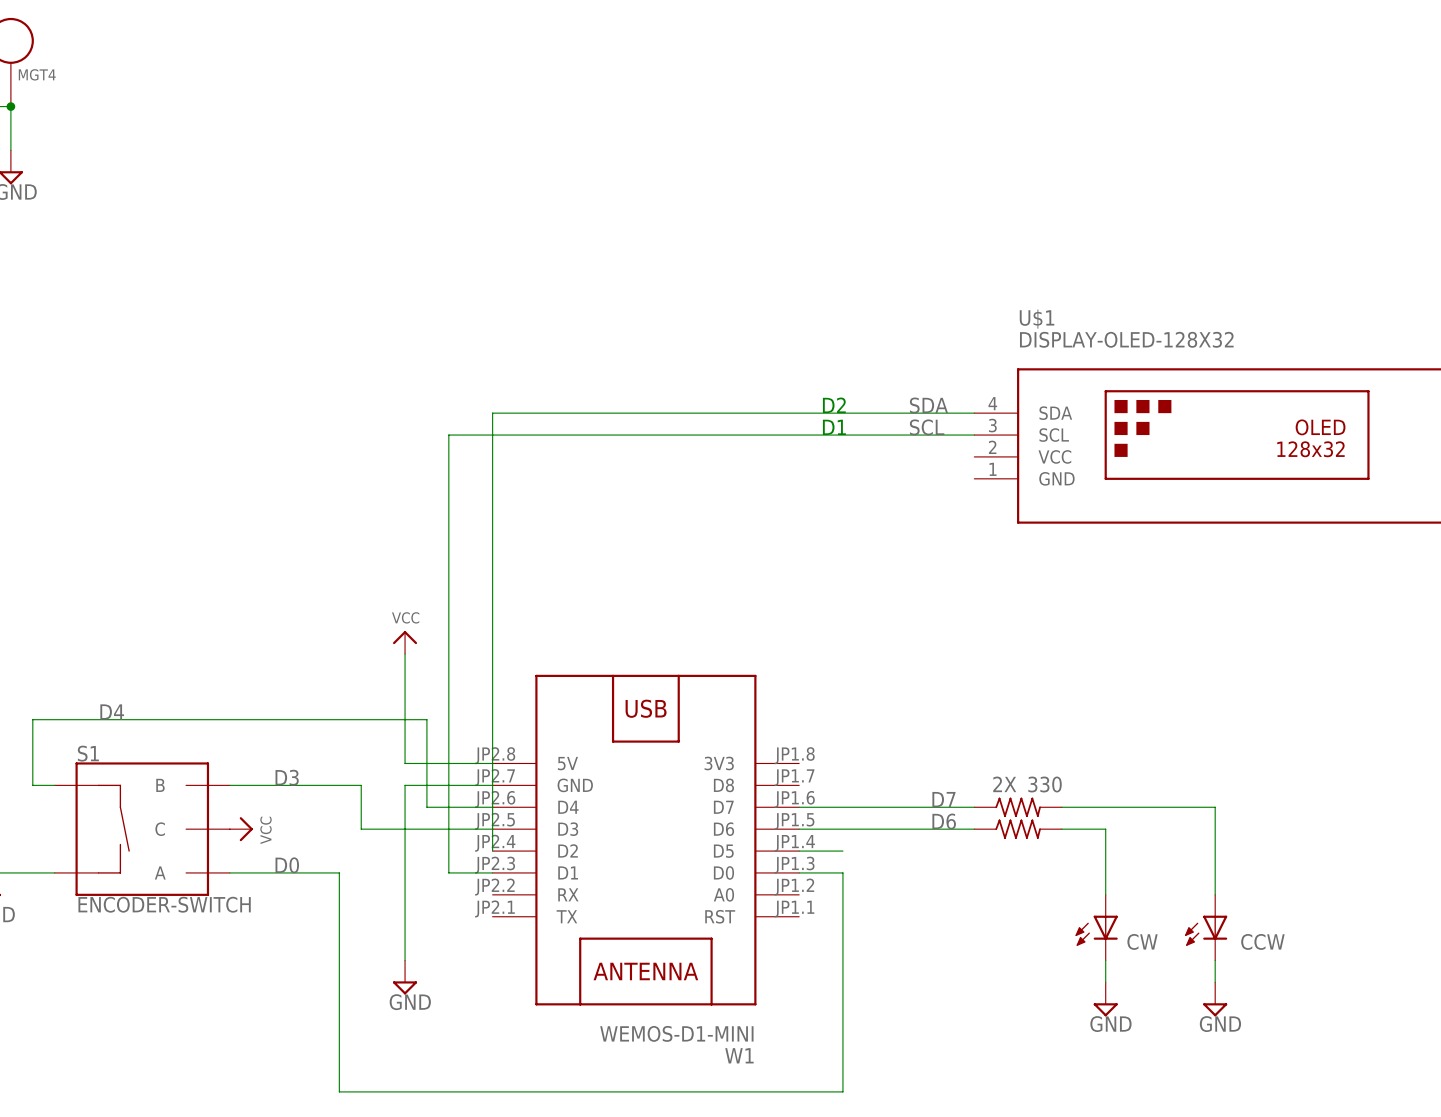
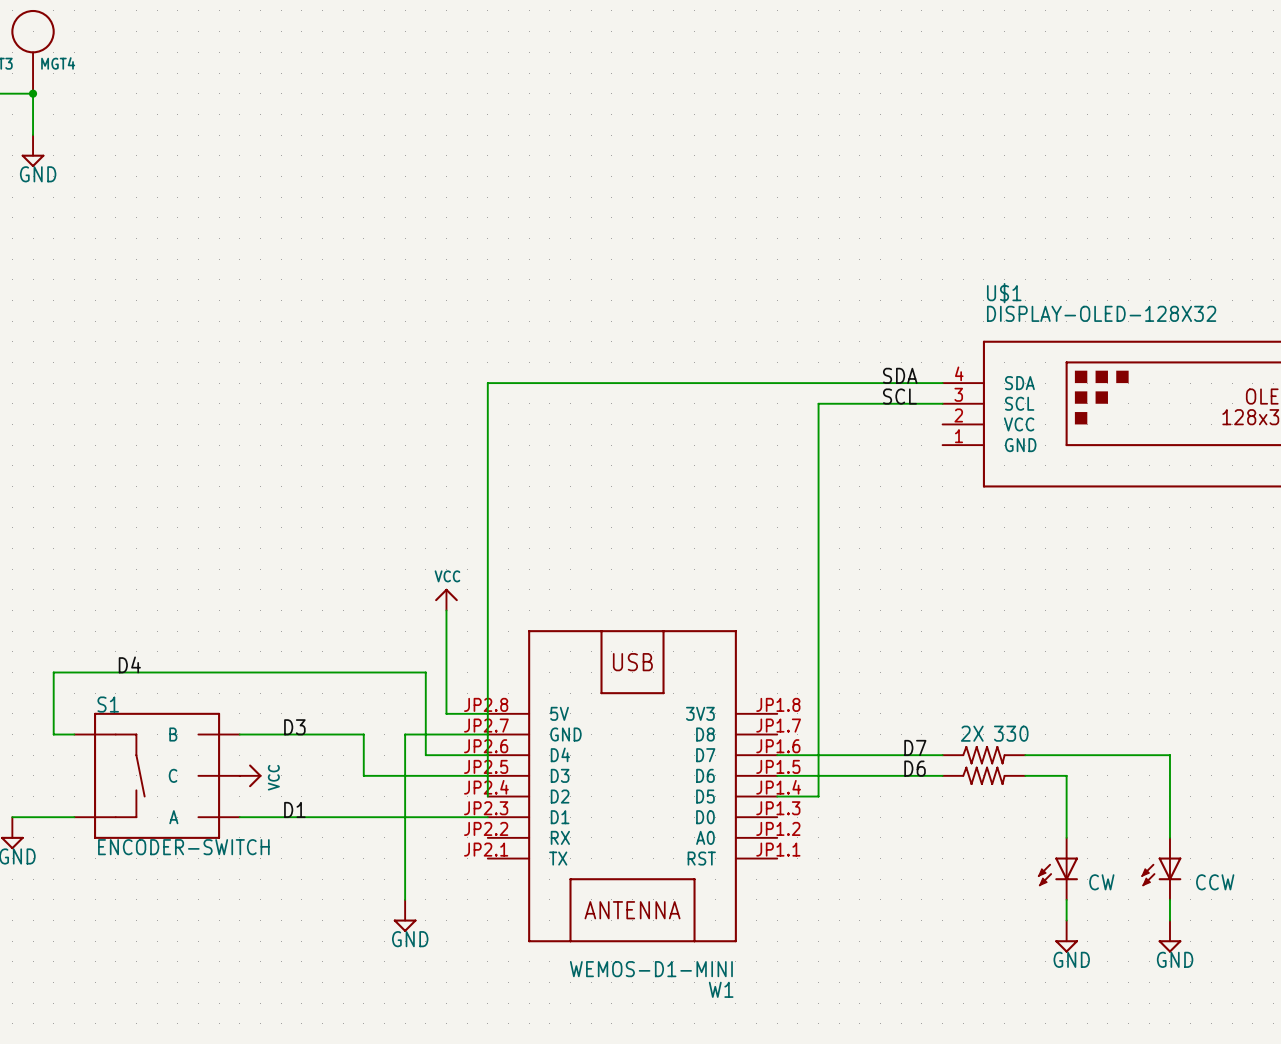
text: D2 (834, 405) -> none
text: D1 (834, 427) -> none
wire: (842, 435) (448, 435) (448, 653) -> (818, 403) (818, 796)
power symbol position: VCC (405, 642) -> VCC (446, 599)
wire: (405, 653) (405, 763) (448, 763) (448, 872) -> (343, 817) (446, 817)
label: D0 (287, 865) -> D1 (294, 809)
wire: (339, 872) (339, 1091) (842, 1091) (842, 872) (799, 872) -> none

